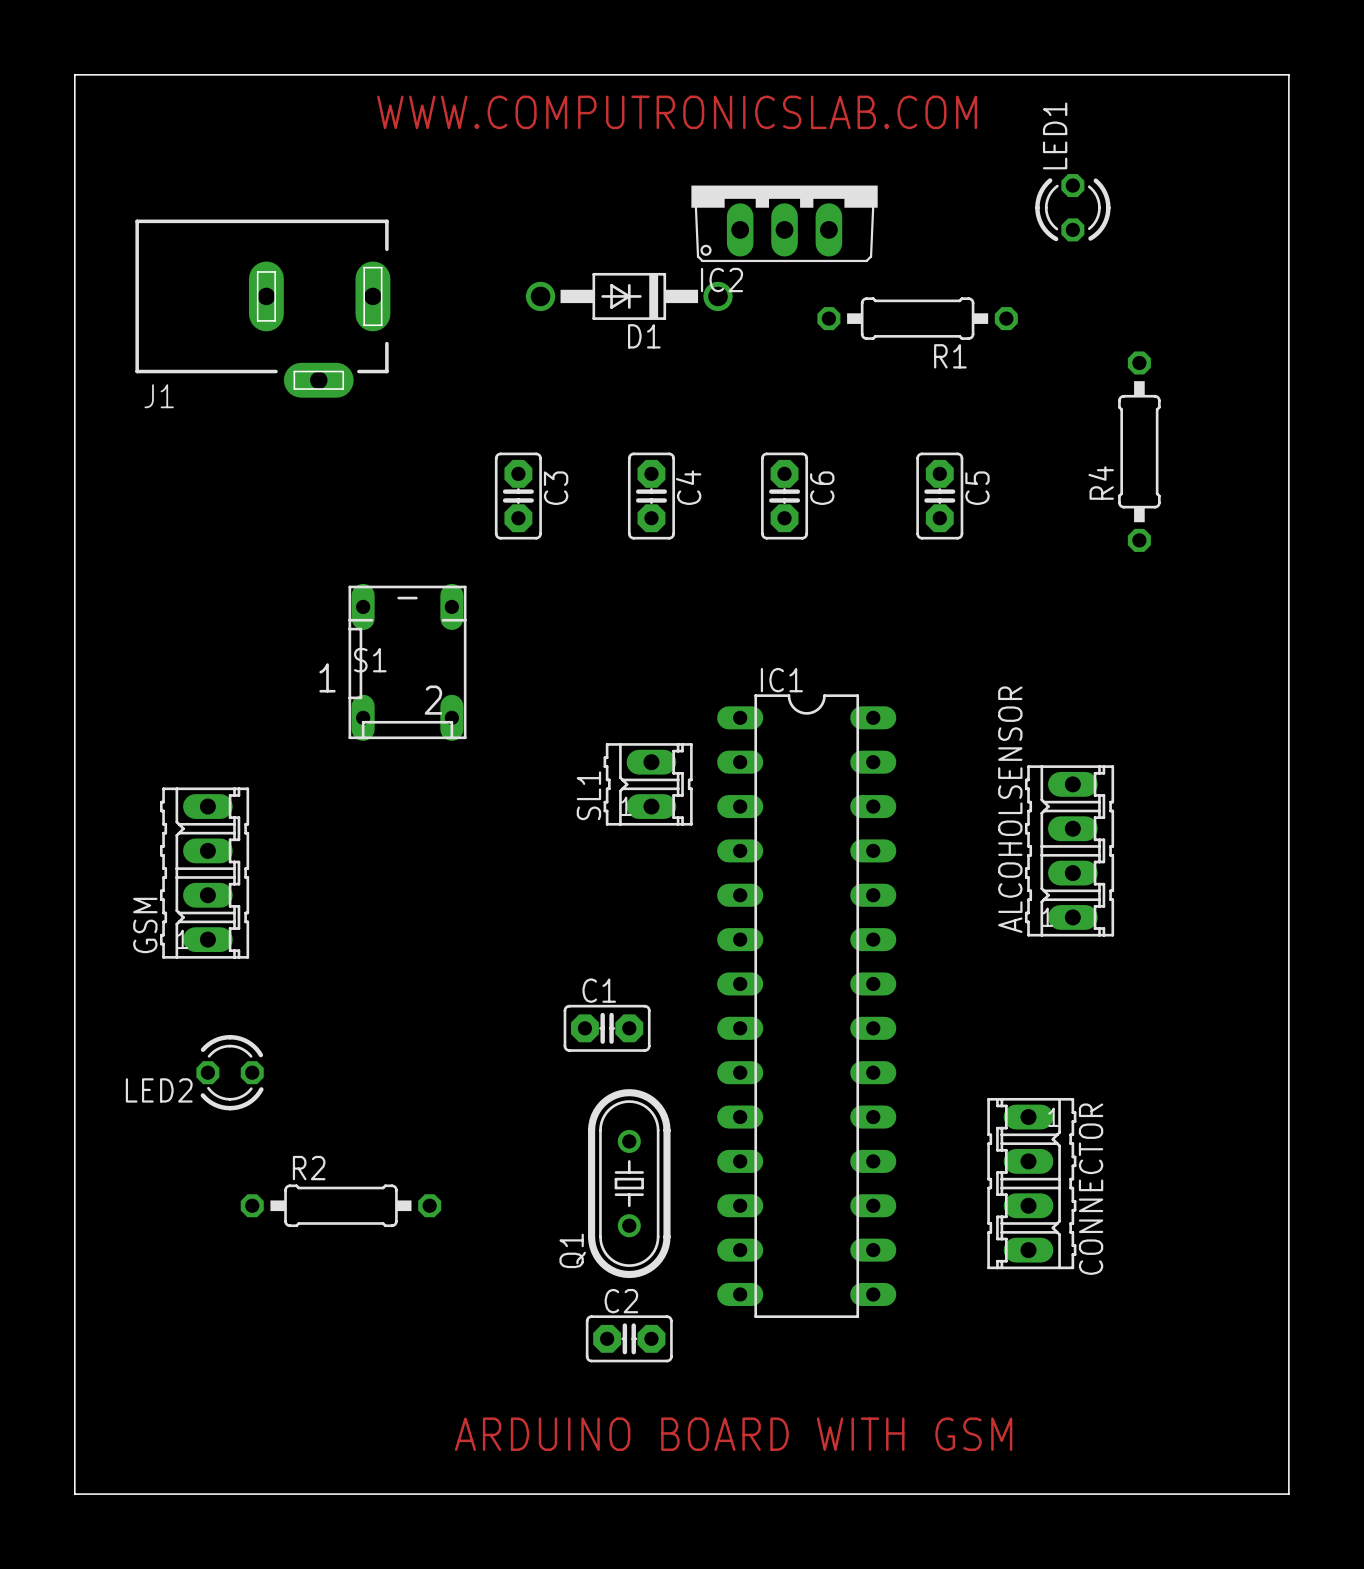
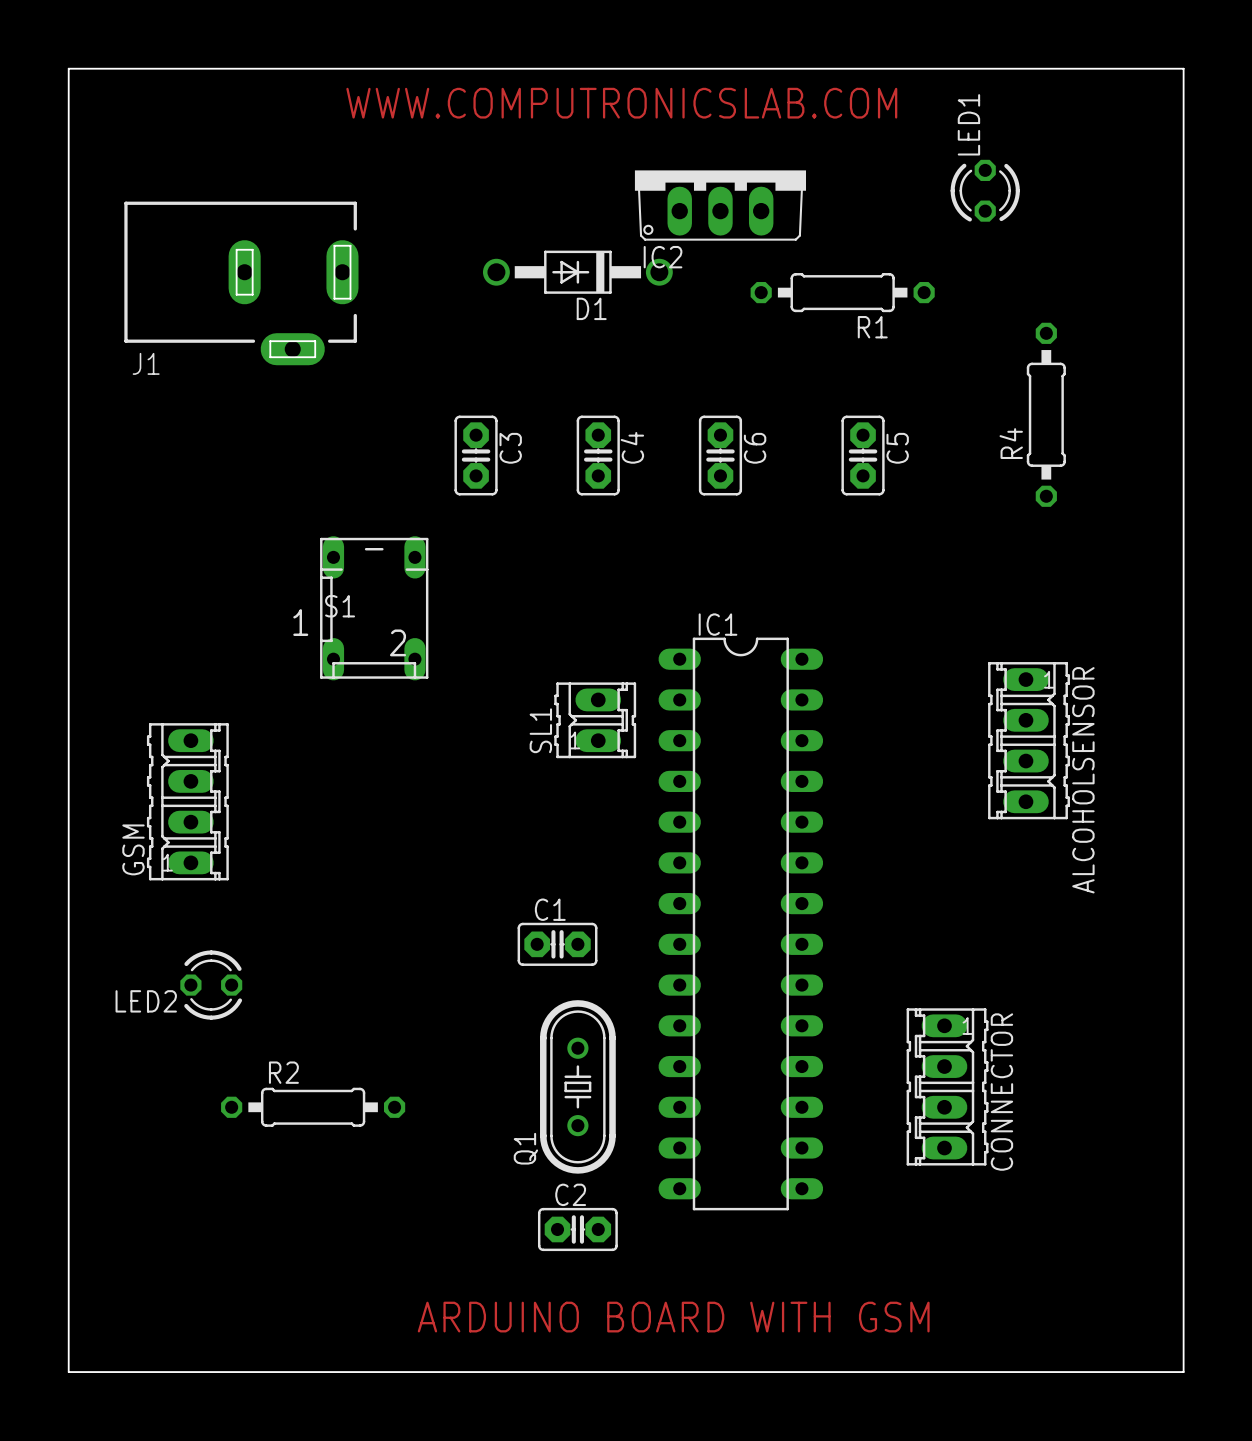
ALCOHOLSENSOR: none -> (1029, 740)
ALCOHOLSENSOR: (1069, 850) -> none

